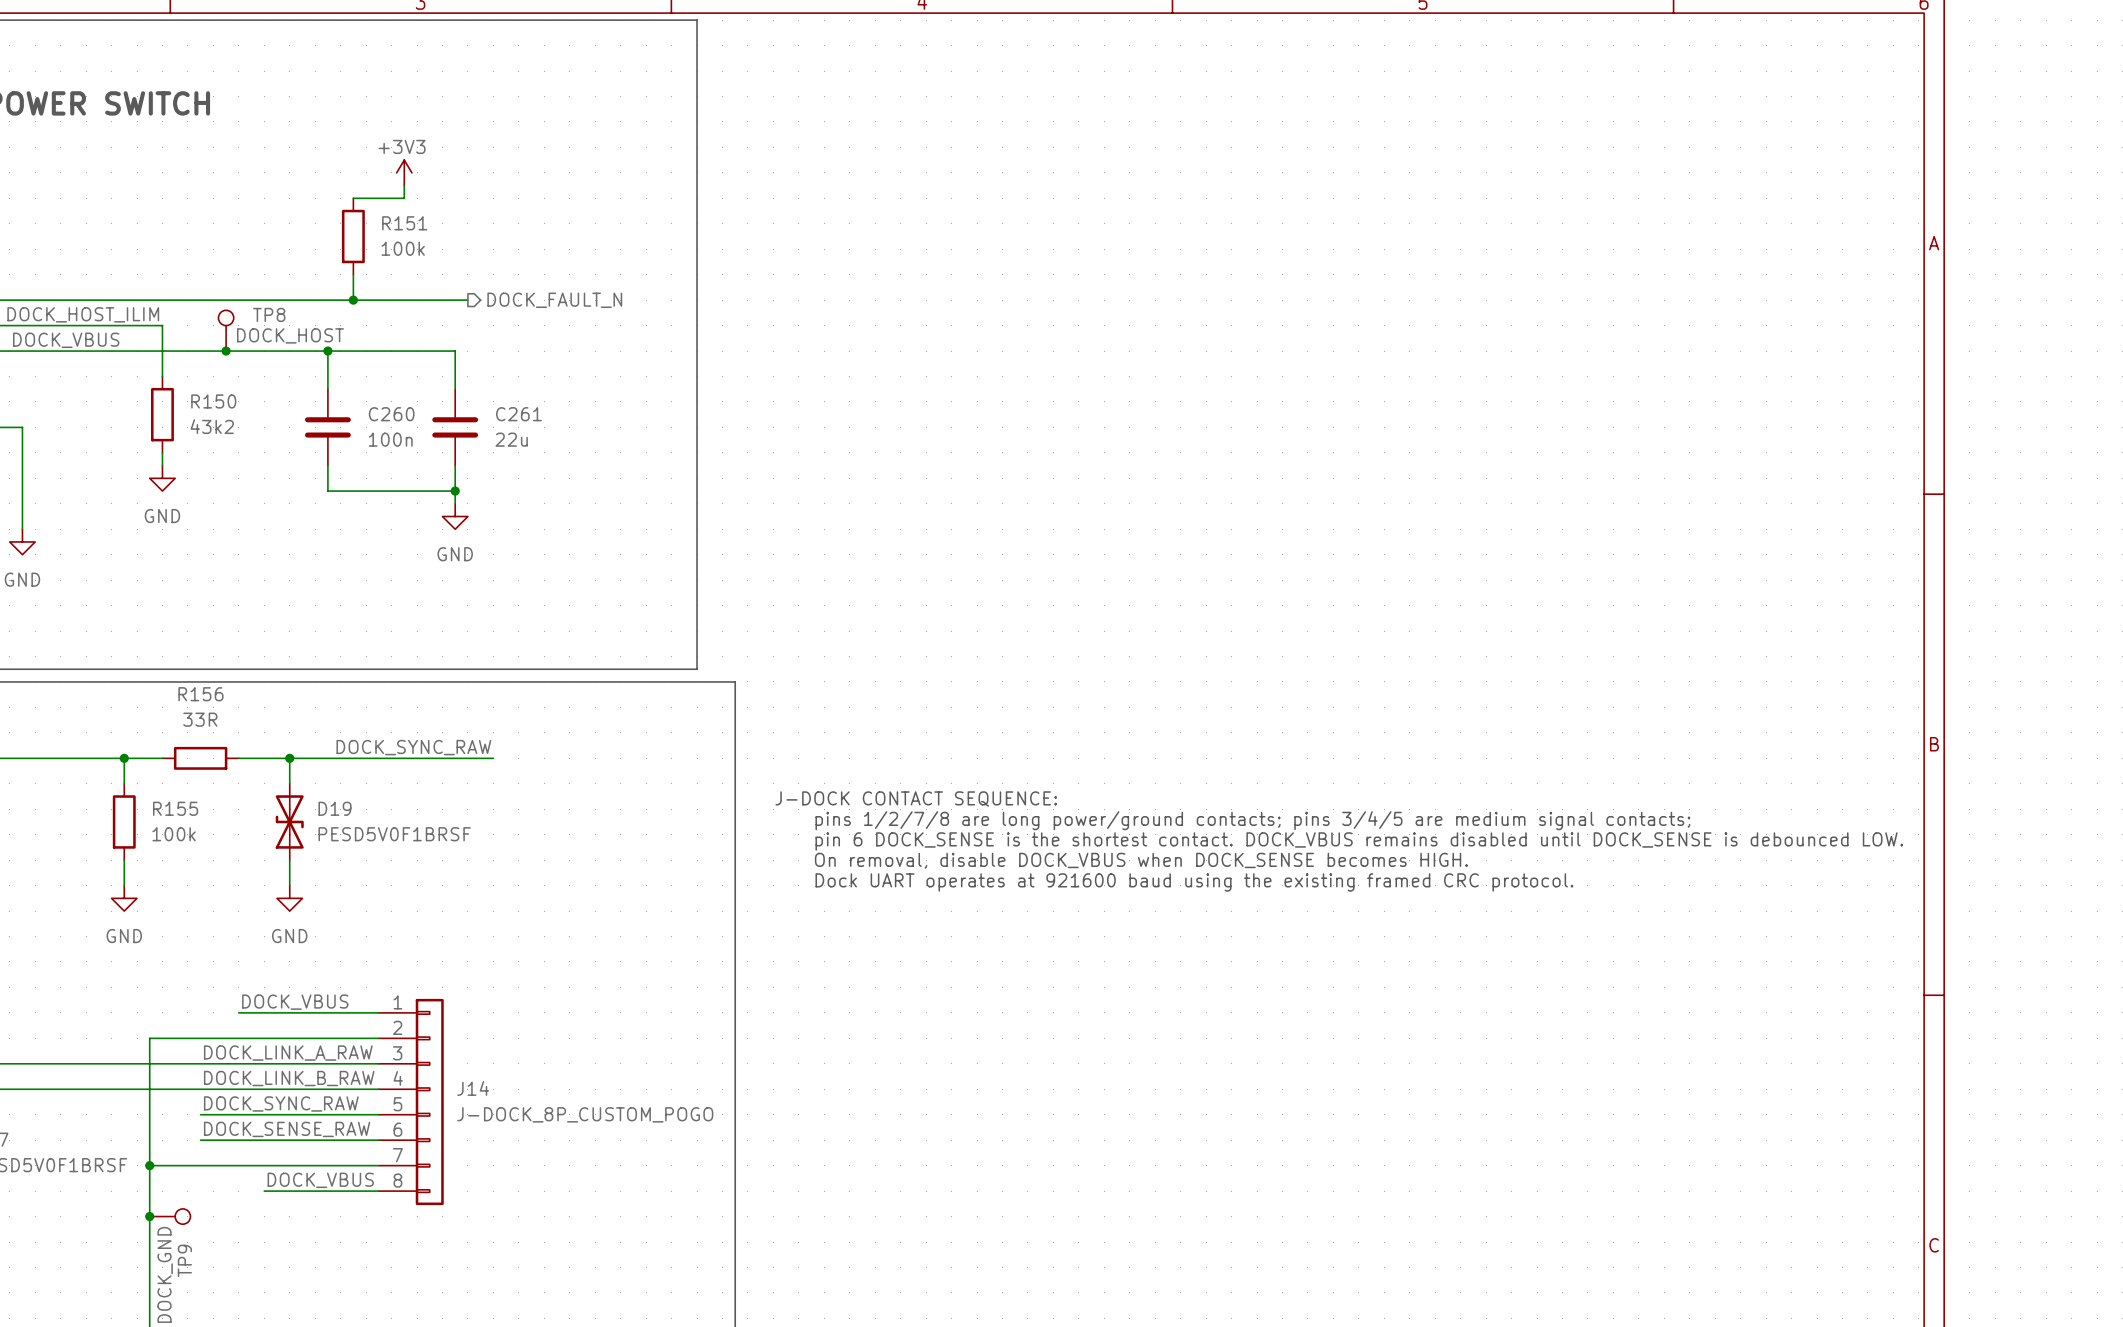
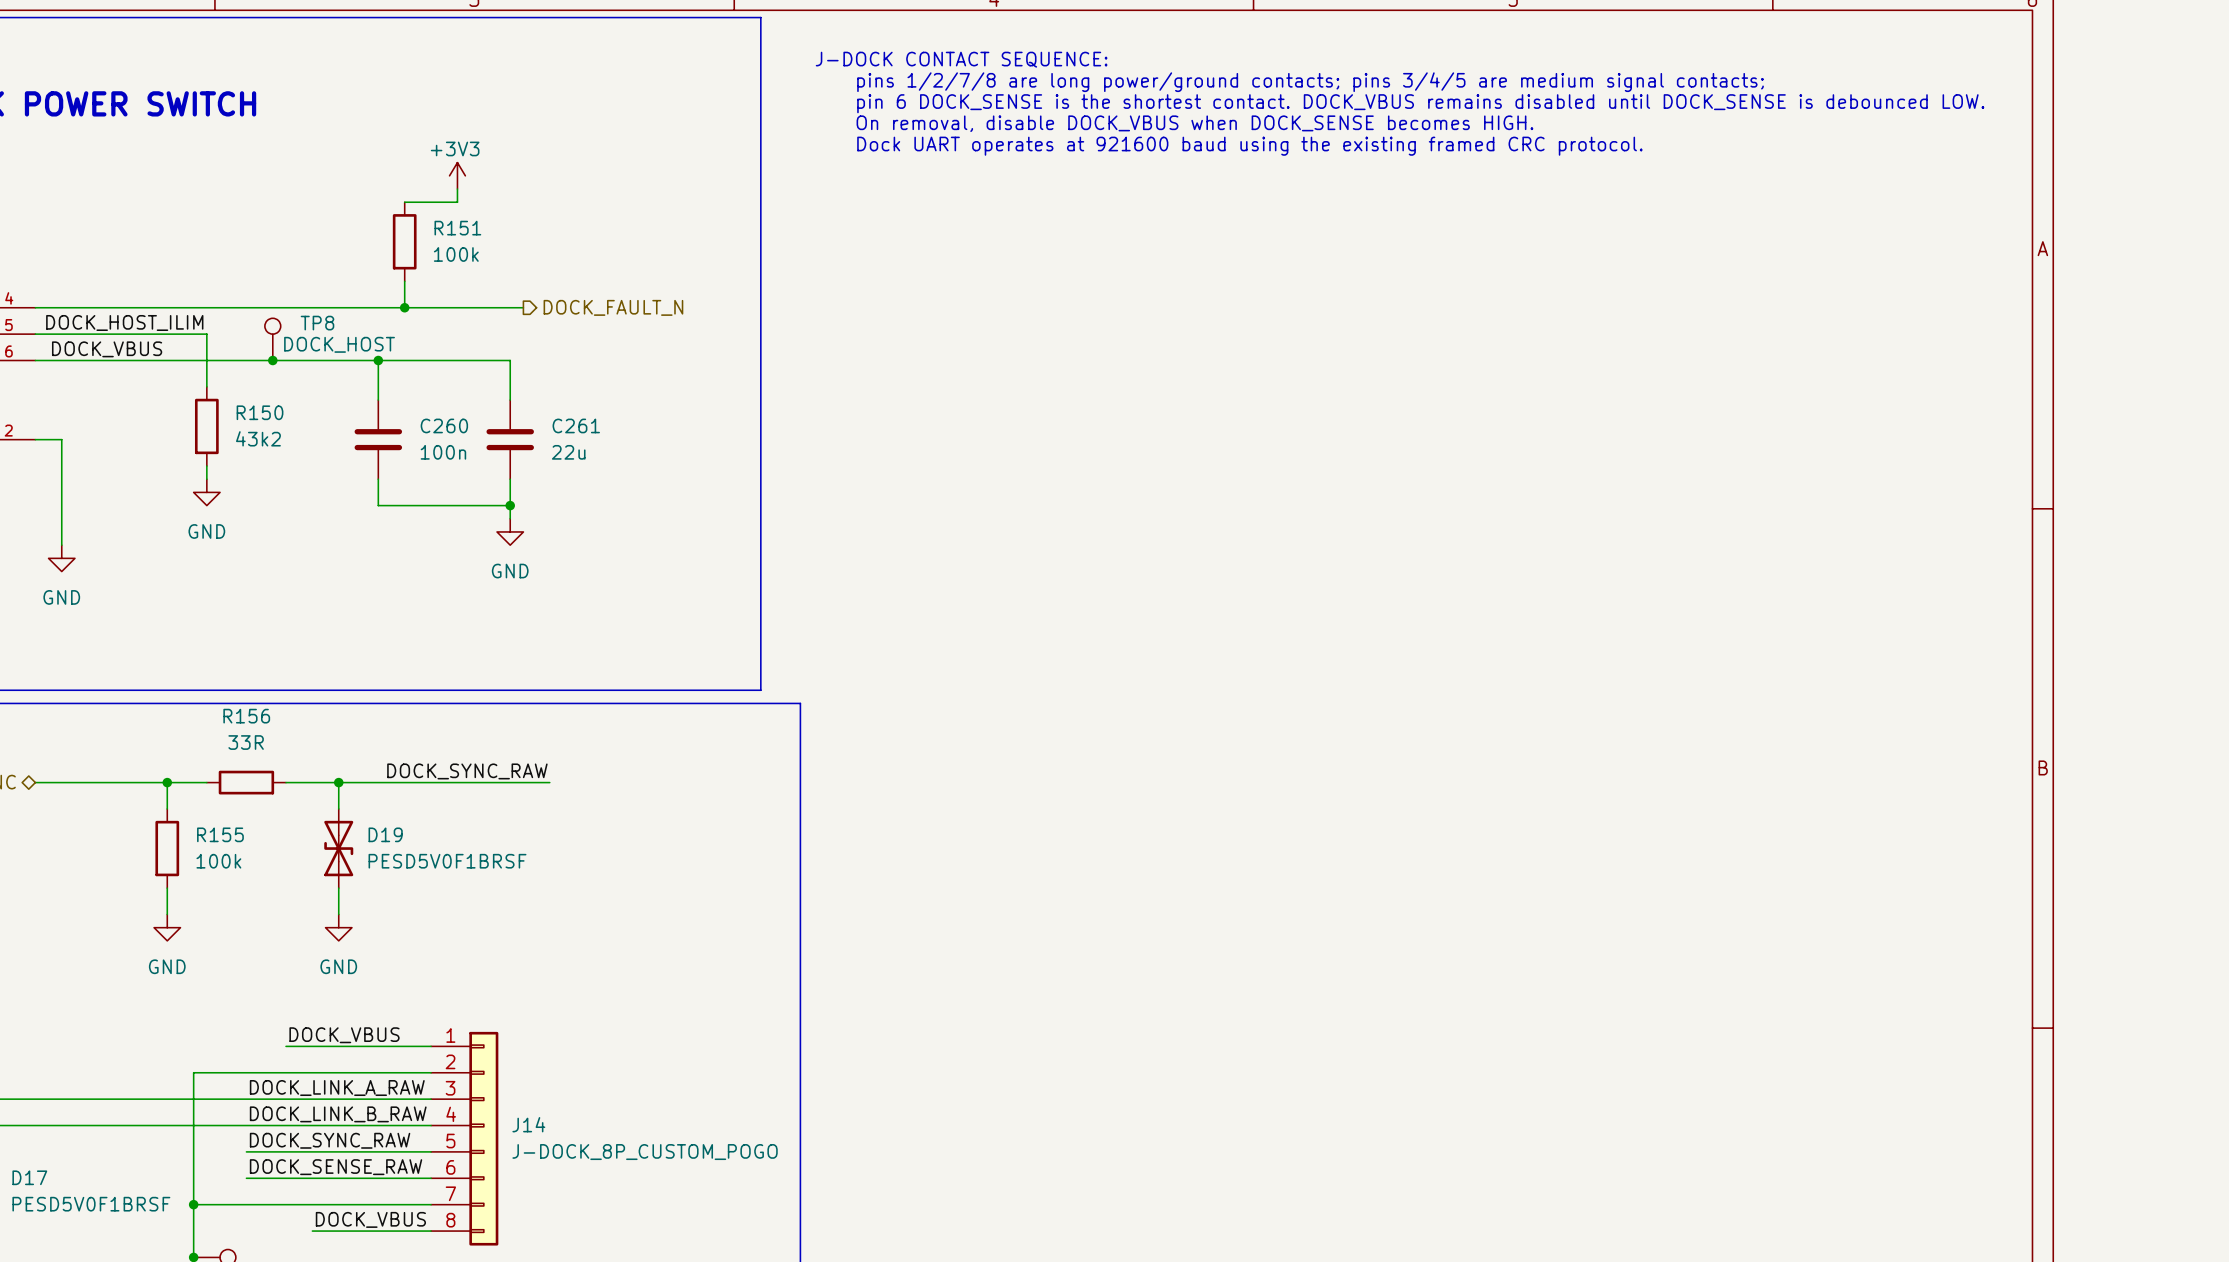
text: none -> J-DOCK CONTACT SEQUENCE: (961, 59)
text: none -> pins 1/2/7/8 are long power/ground contacts; pins 3/4/5 are medium signal contacts; (1310, 82)
text: none -> pin 6 DOCK_SENSE is the shortest contact. DOCK_VBUS remains disabled until DOCK_SENSE is debounced LOW. (1420, 103)
text: none -> On removal, disable DOCK_VBUS when DOCK_SENSE becomes HIGH. (1194, 123)
text: none -> Dock UART operates at 921600 baud using the existing framed CRC protocol. (1249, 146)
text: J-DOCK CONTACT SEQUENCE: (916, 798) -> none
text: pins 1/2/7/8 are long power/ground contacts; pins 3/4/5 are medium signal contacts; (1252, 820) -> none
text: pin 6 DOCK_SENSE is the shortest contact. DOCK_VBUS remains disabled until DOCK_SENSE is debounced LOW. (1359, 841) -> none
text: On removal, disable DOCK_VBUS when DOCK_SENSE becomes HIGH. (1141, 860) -> none
text: Dock UART operates at 921600 baud using the existing framed CRC protocol. (1194, 882) -> none

